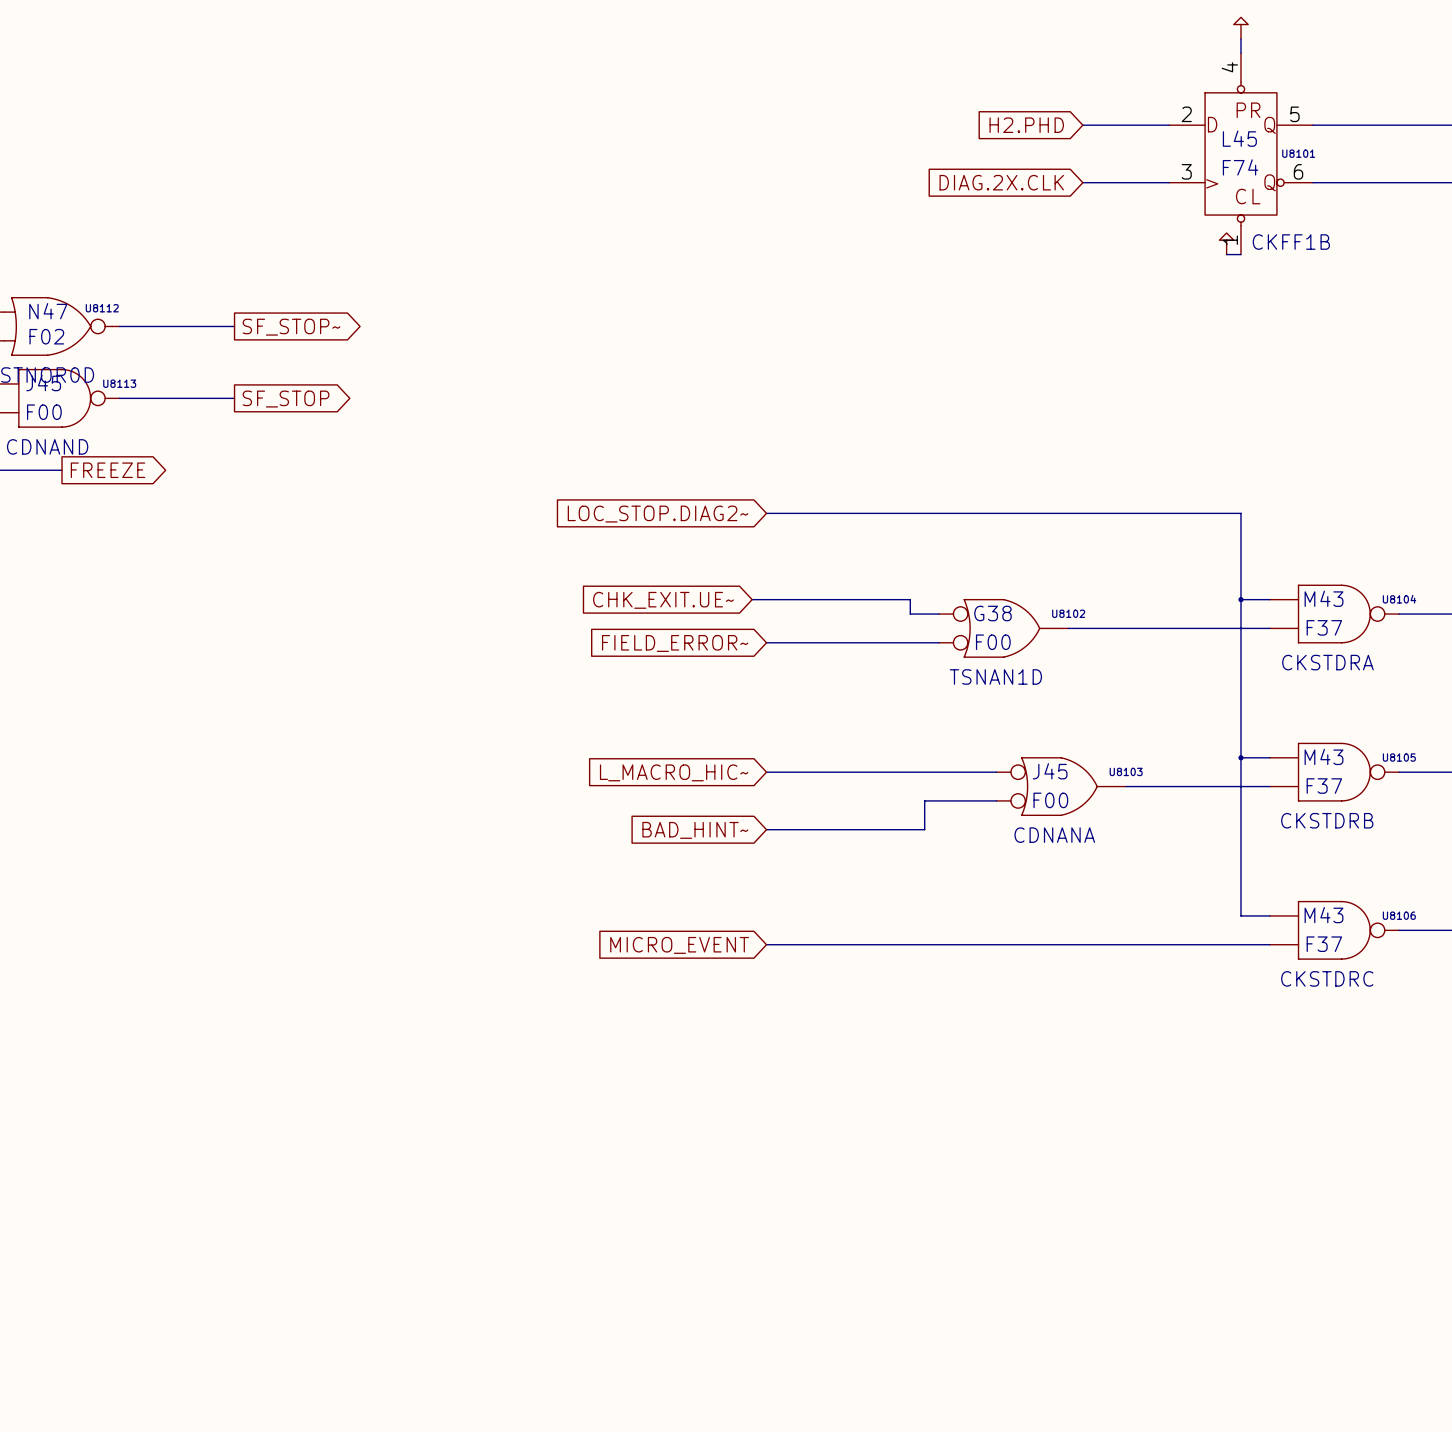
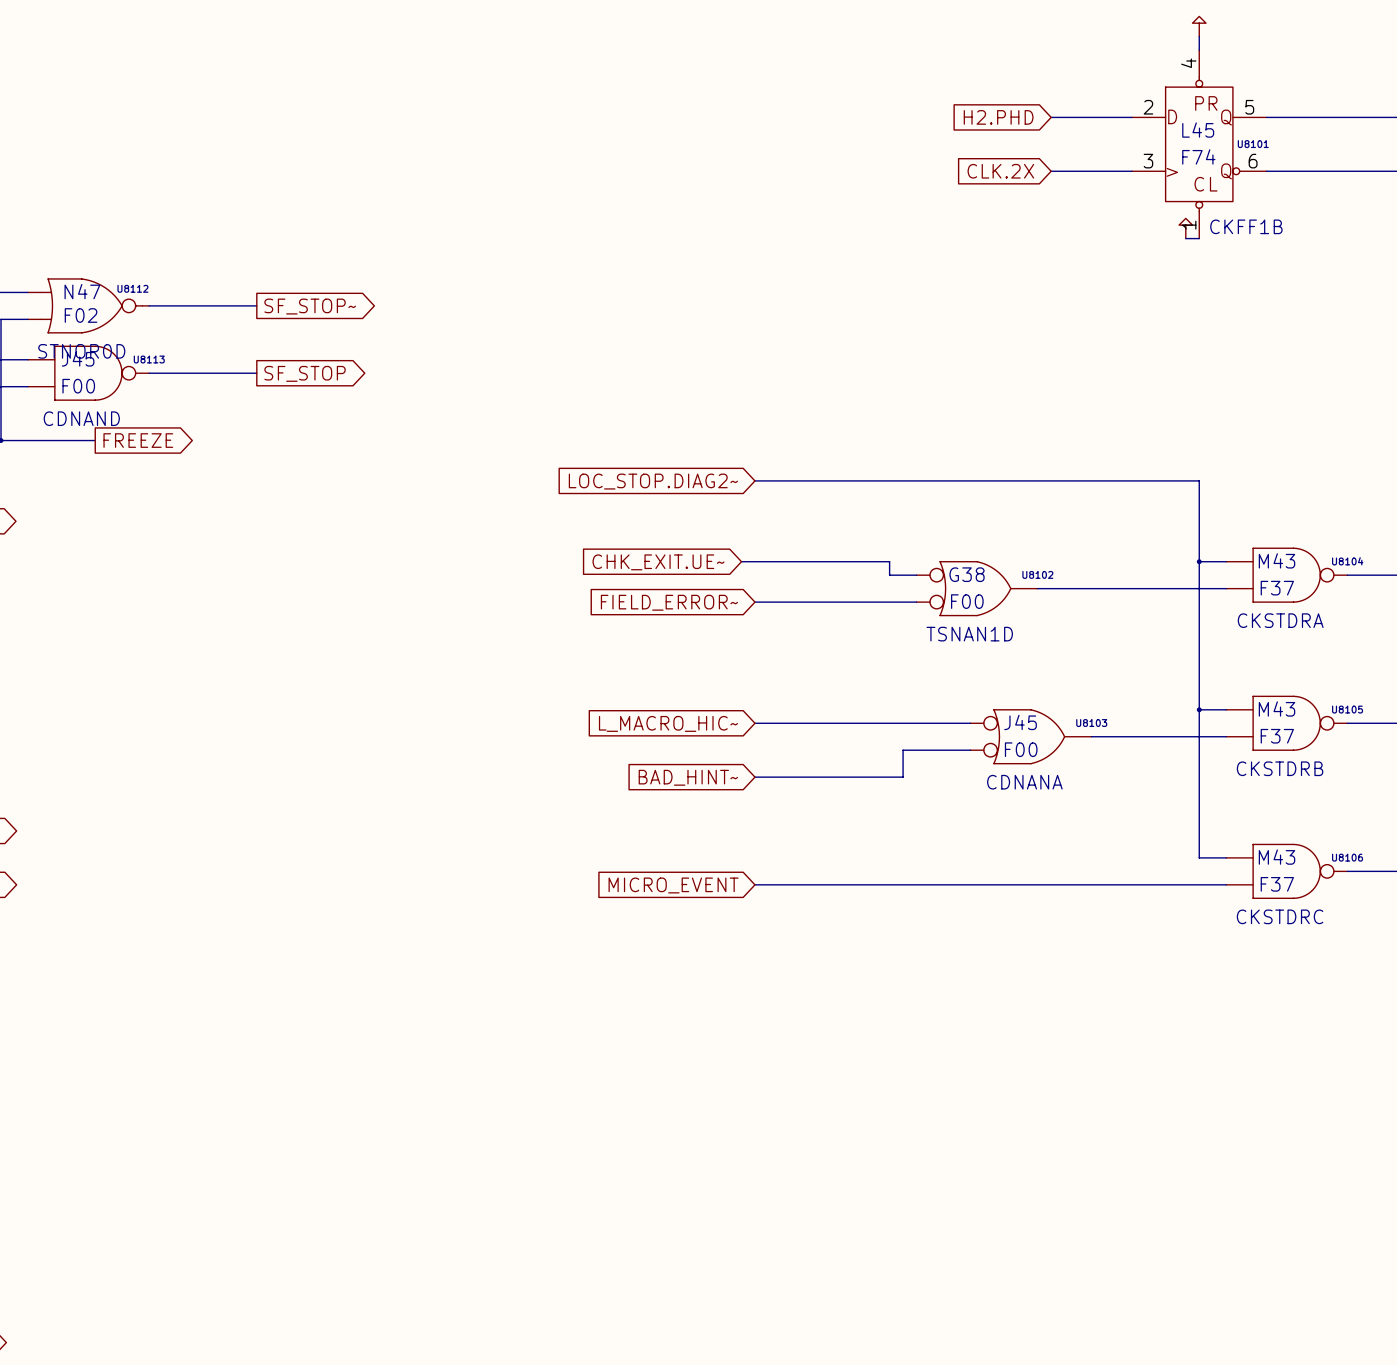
global label: DIAG.2X.CLK (1001, 182) -> CLK.2X (1000, 171)

